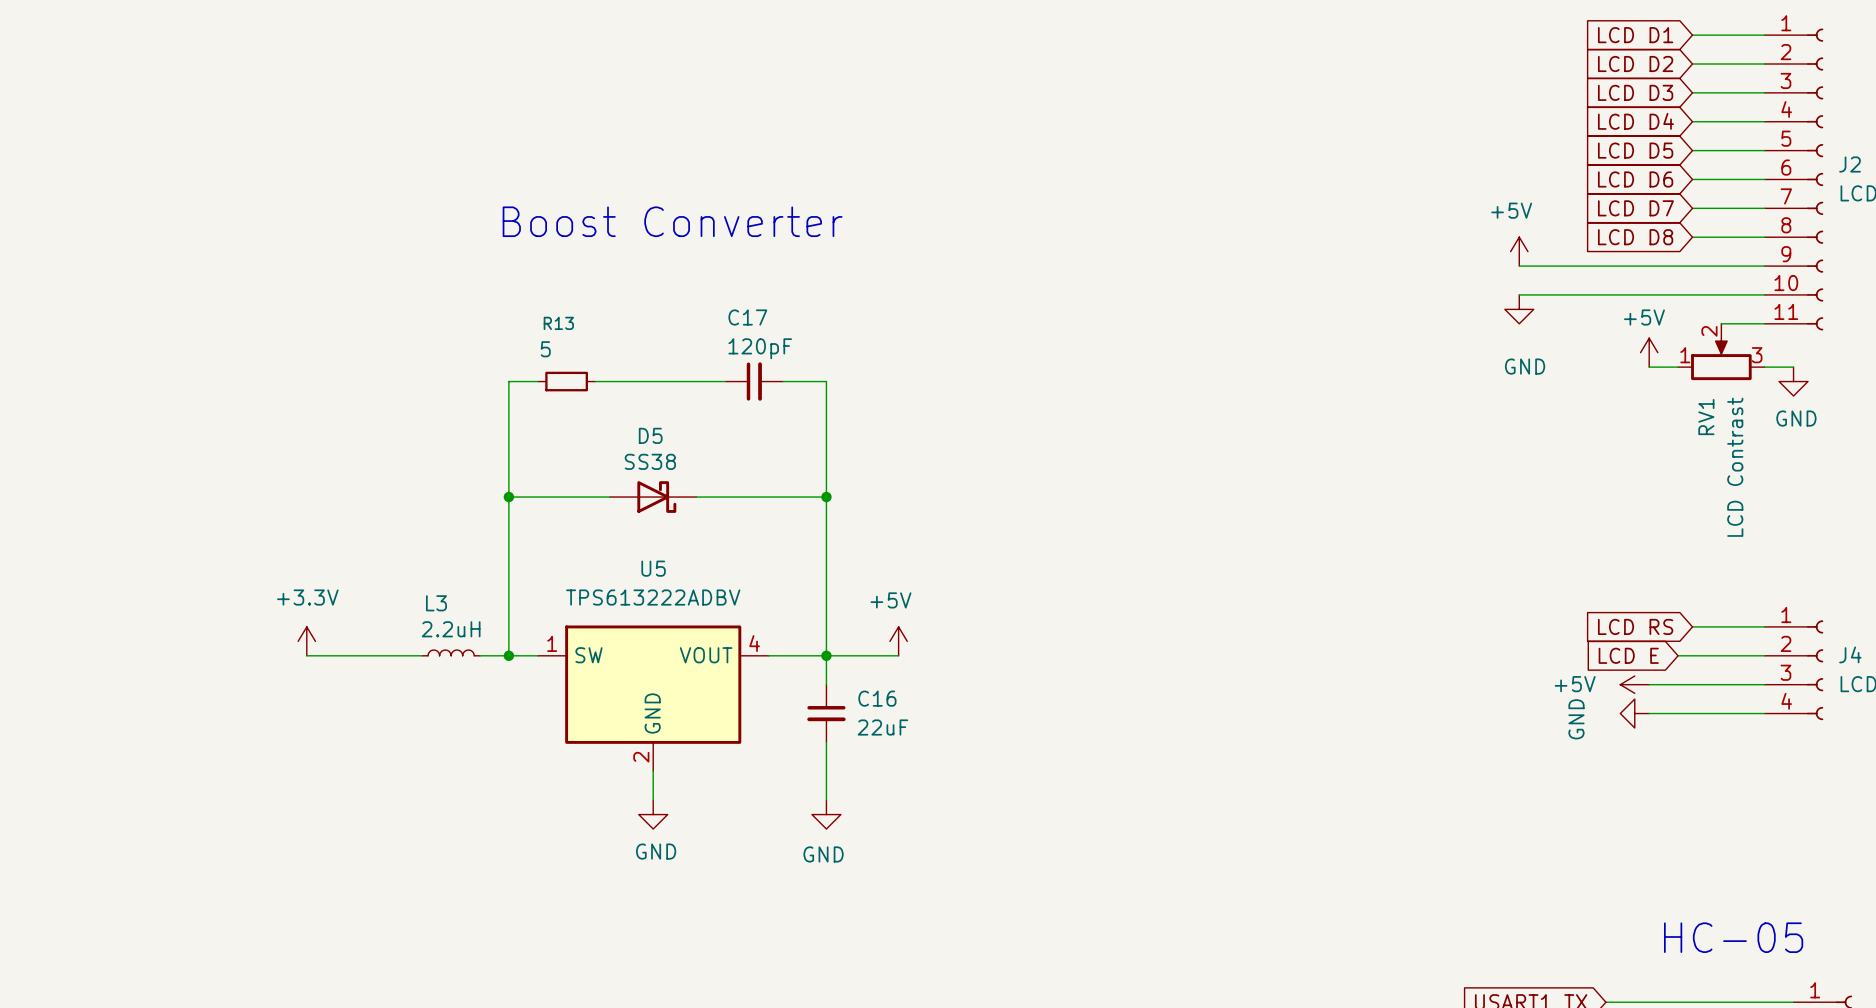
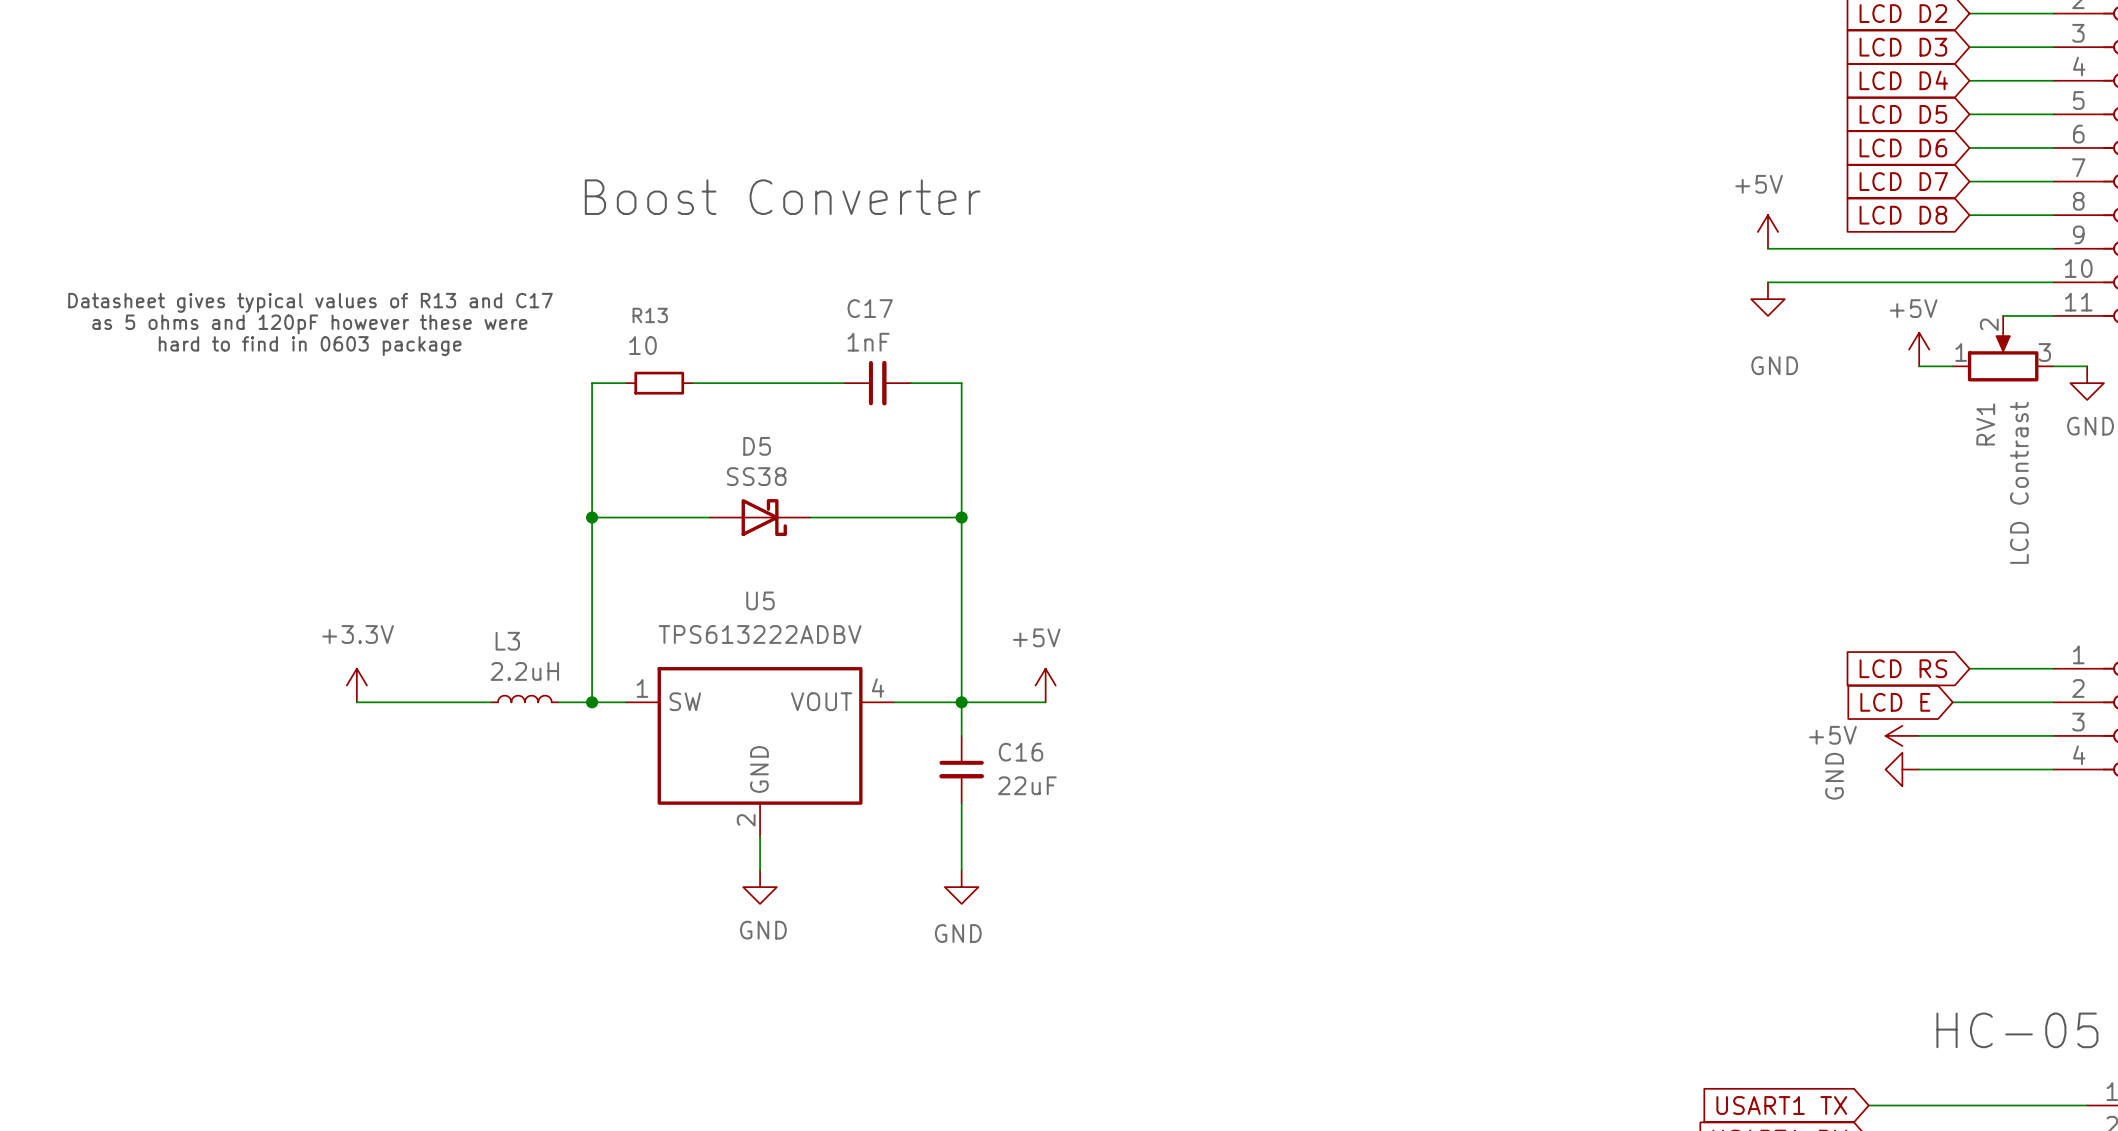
text: none -> Datasheet gives typical values of R13 and C17 (310, 302)
text: none -> as 5 ohms and 120pF however these were (309, 324)
C17 value: 120pF (760, 348) -> 1nF (868, 342)
text: none -> hard to find in 0603 package (310, 346)
R13 value: 5 (545, 349) -> 10 (642, 345)

